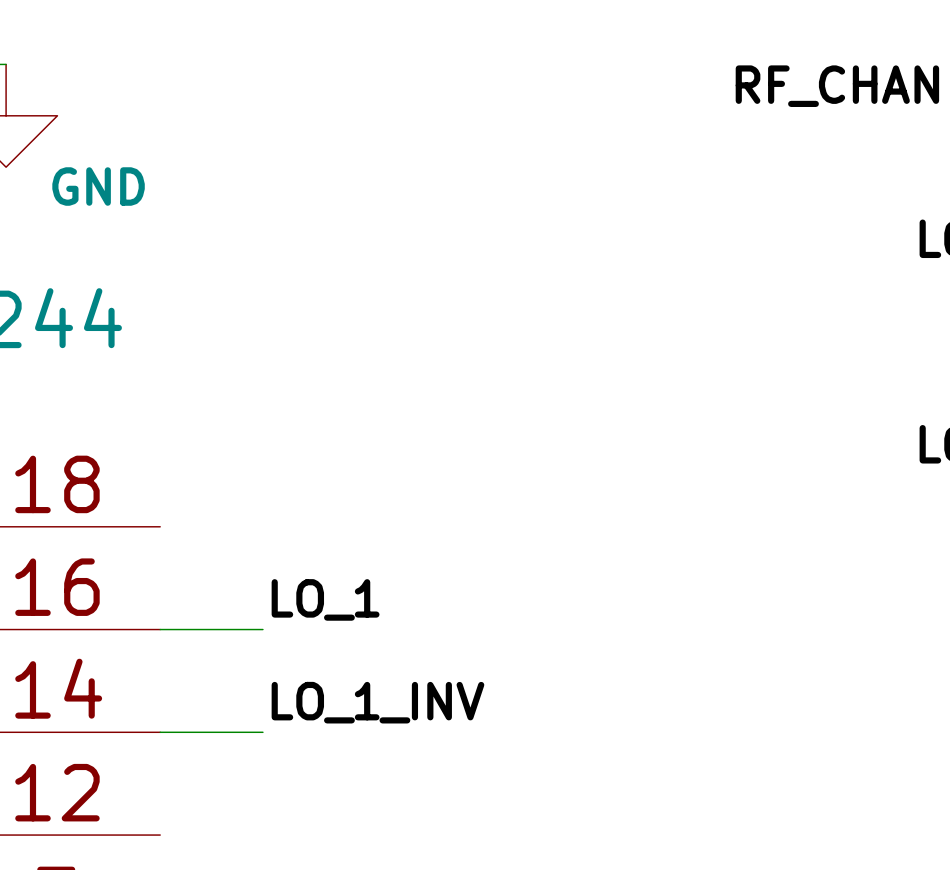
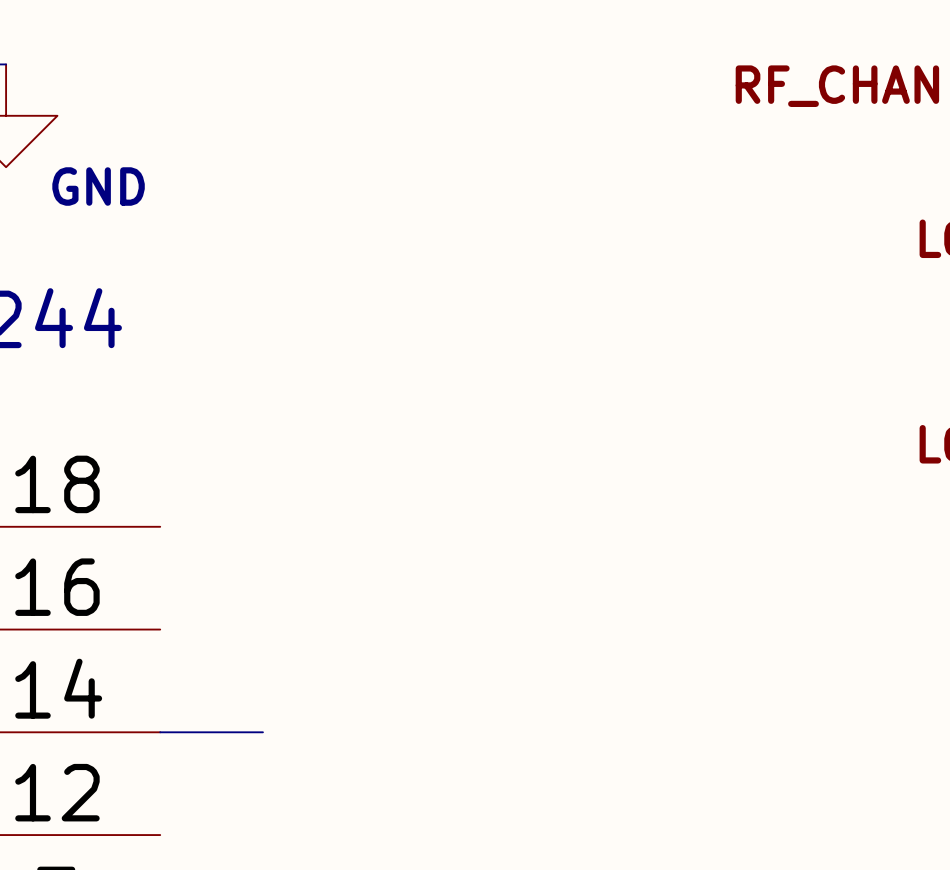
label: LO_1 (325, 599) -> none
wire: (160, 629) (262, 629) -> none
label: LO_1_INV (377, 702) -> none

